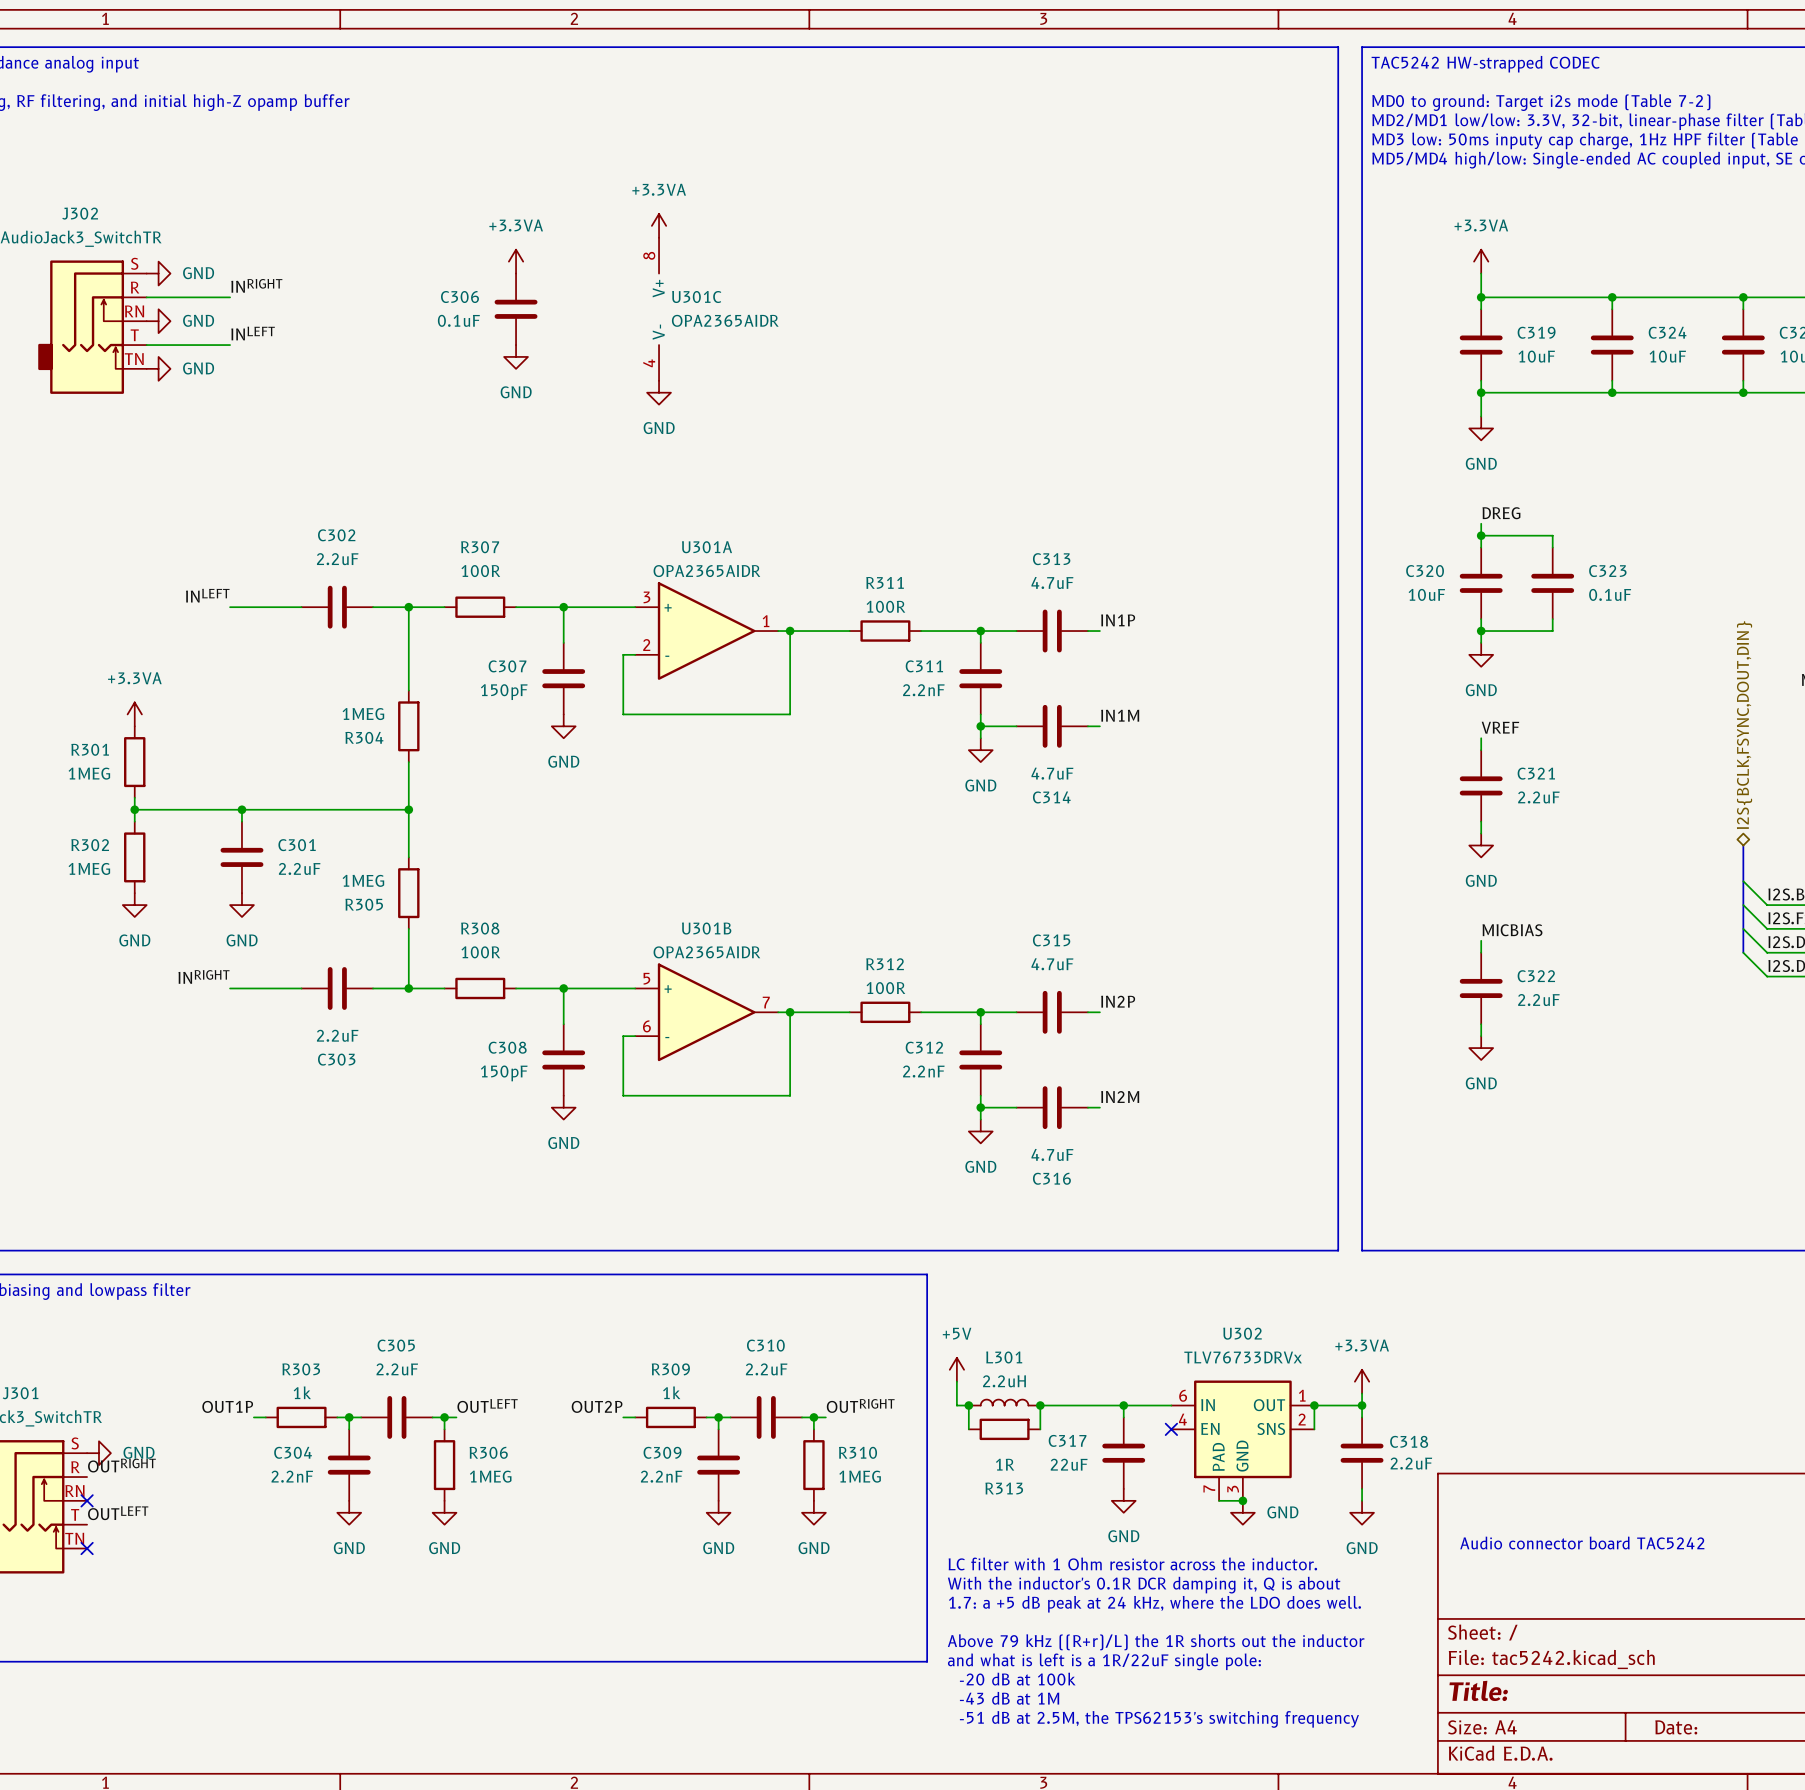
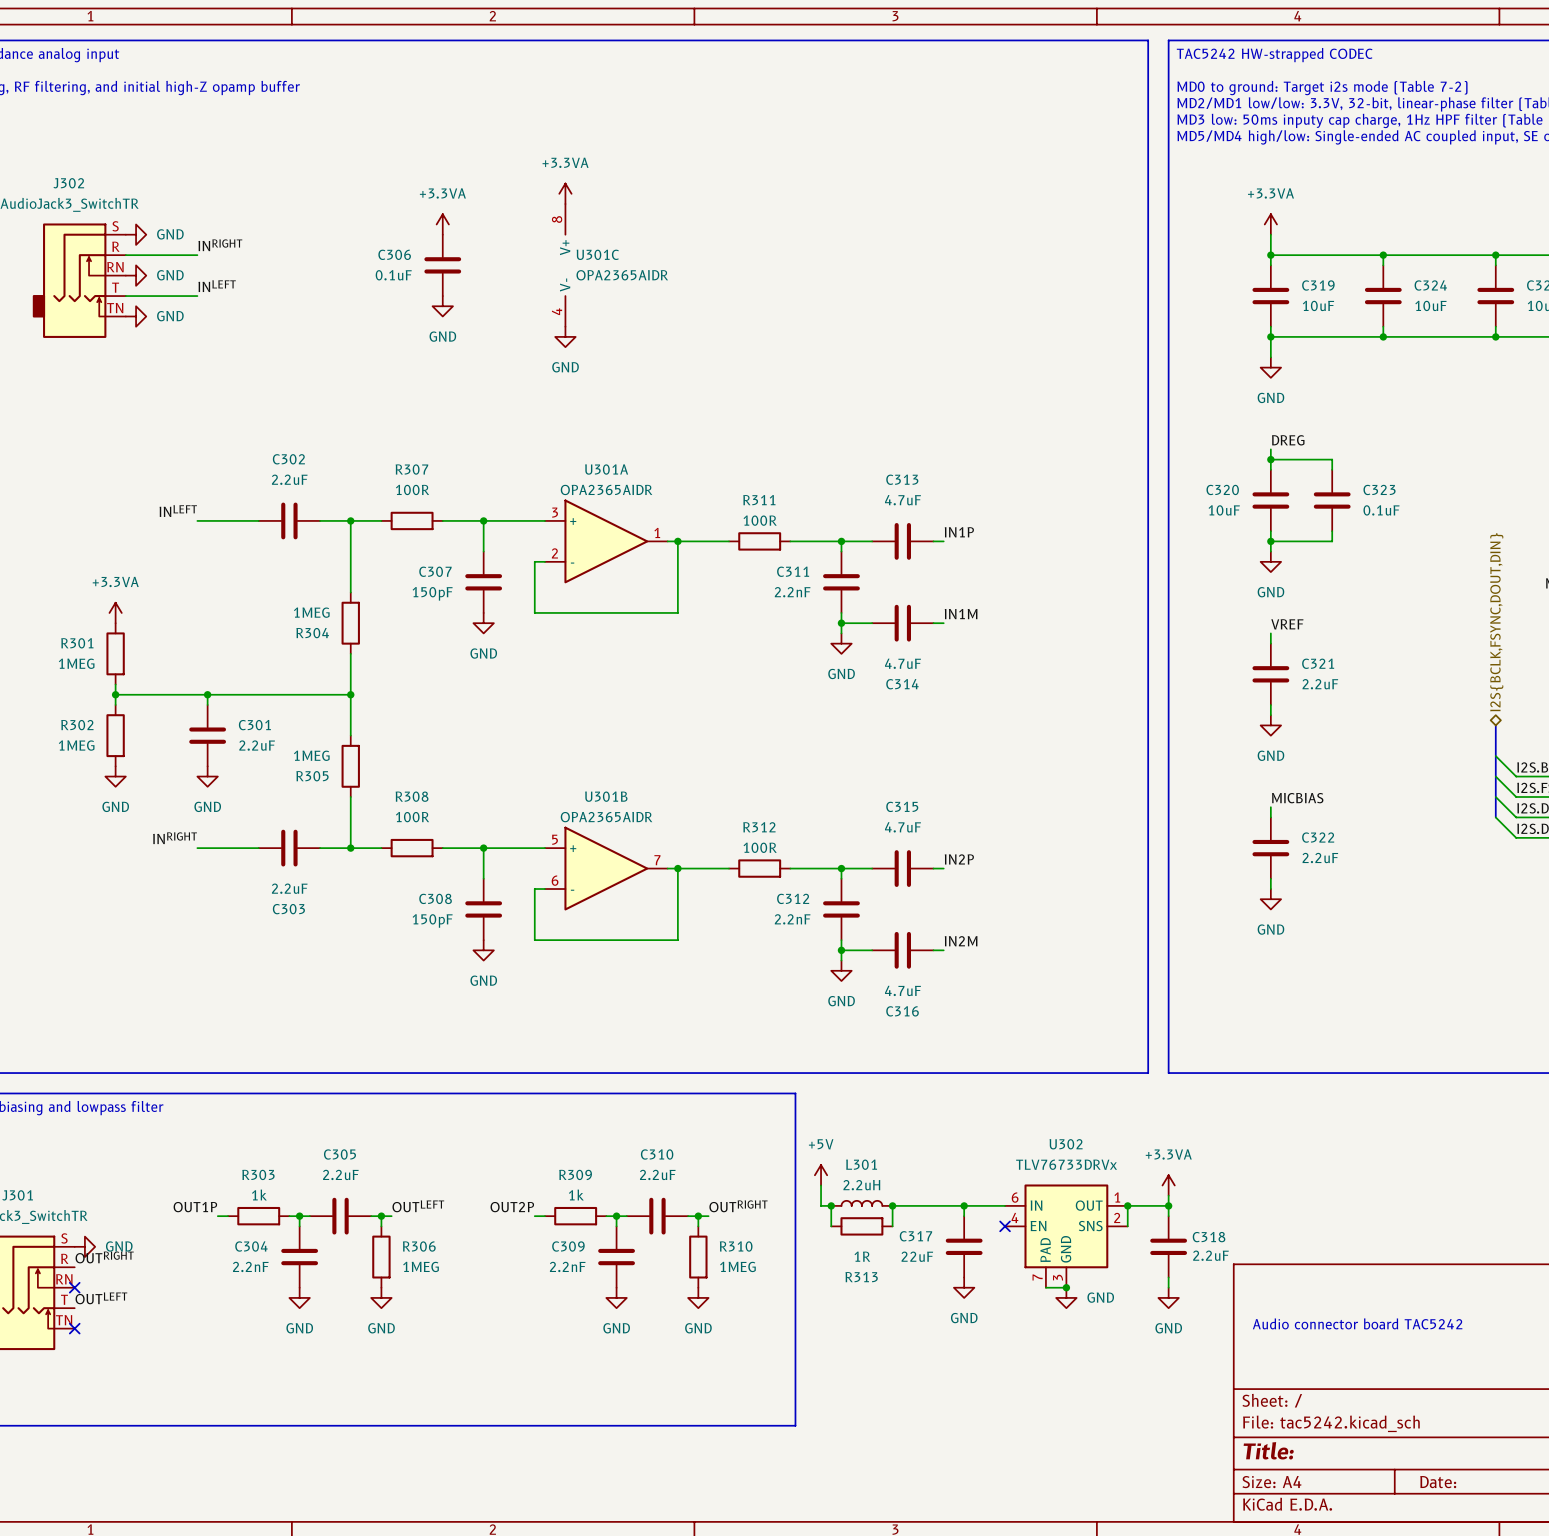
text: LC filter with 1 Ohm resistor across the inductor. (1132, 1563) -> none
text: With the inductor's 0.1R DCR damping it, Q is about (1144, 1585) -> none
text: 1.7: a +5 dB peak at 24 kHz, where the LDO does well. (1154, 1604) -> none
text: Above 79 kHz ((R+r)/L) the 1R shorts out the inductor (1156, 1642) -> none
text: and what is left is a 1R/22uF single pole: (1104, 1661) -> none
text: -20 dB at 100k (1017, 1679) -> none
text: -43 dB at 1M (1009, 1698) -> none
text: -51 dB at 2.5M, the TPS62153's switching frequency (1159, 1719) -> none

